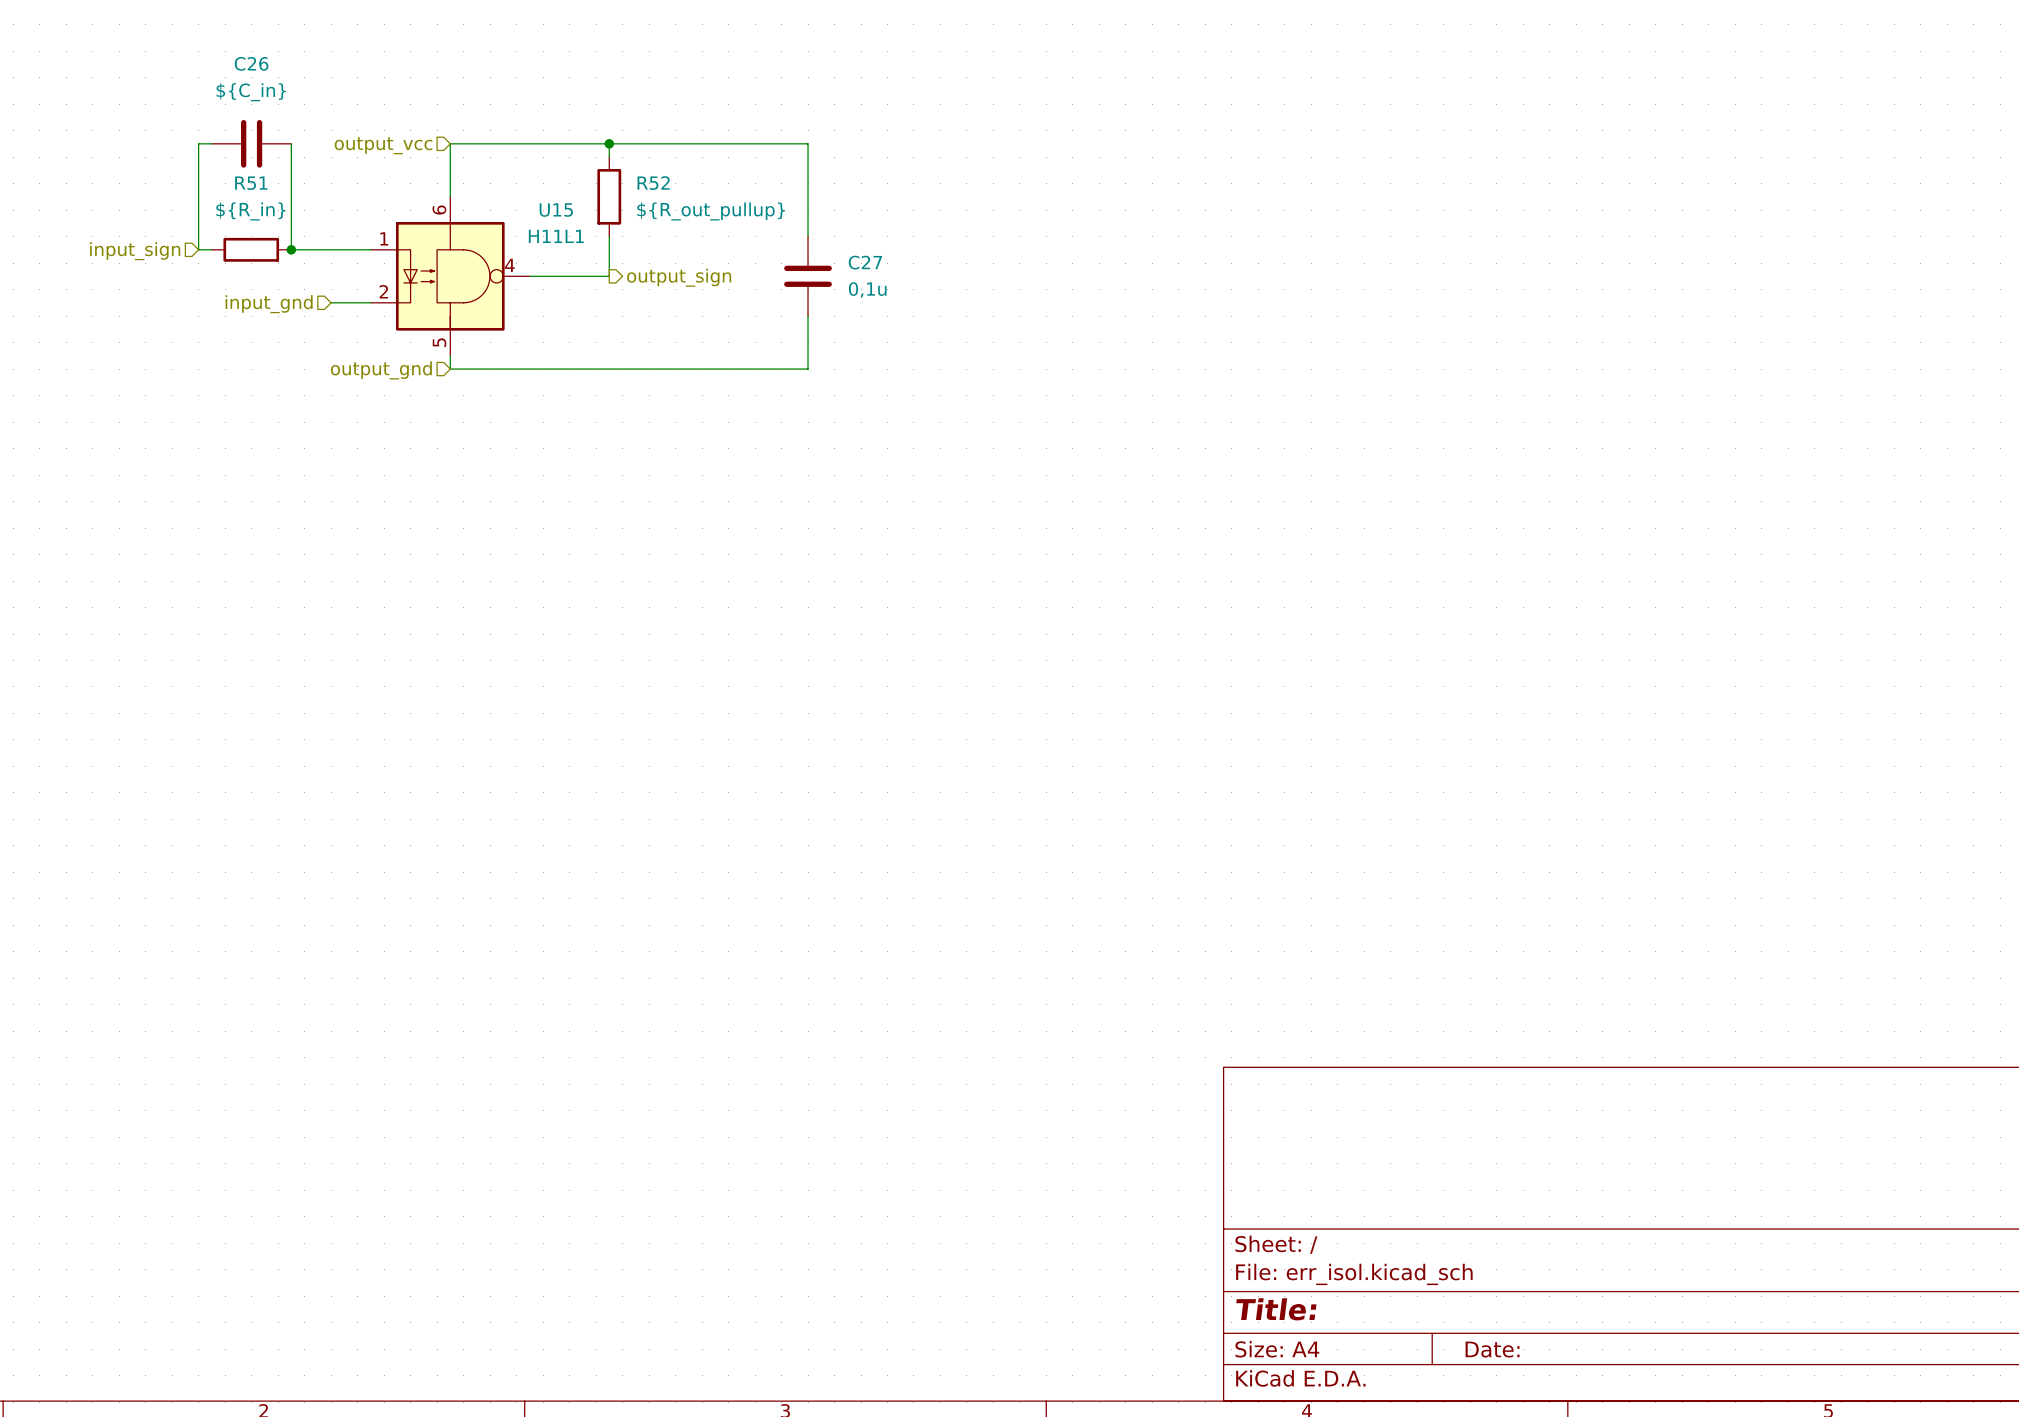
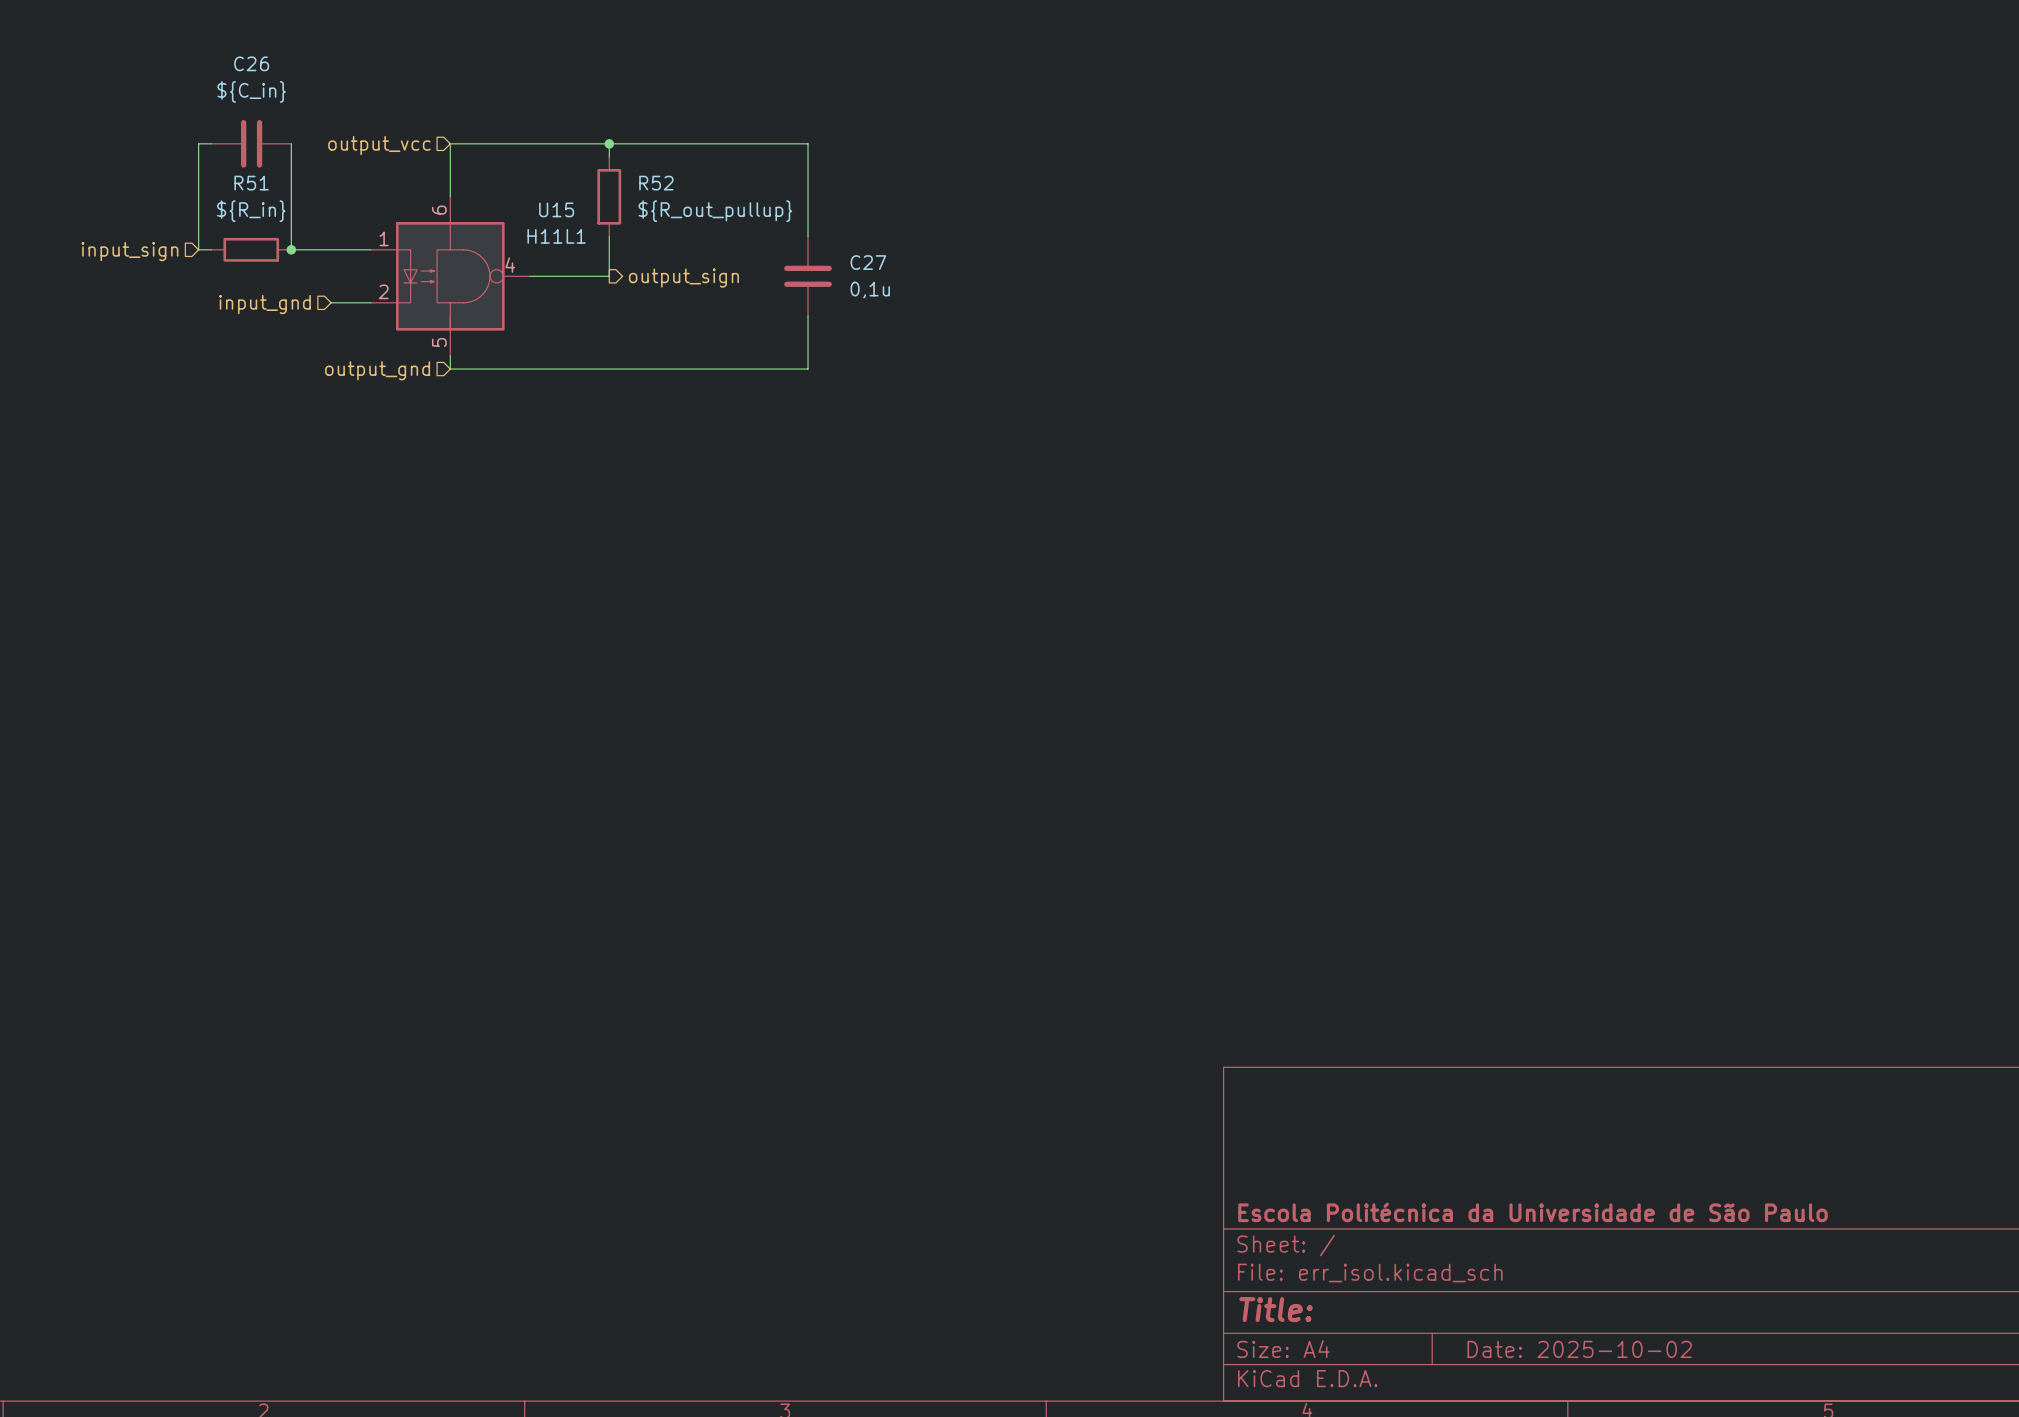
title block: none -> Escola Politécnica da Universidade de São Paulo (1532, 1212)
title block: Date: (1492, 1349) -> Date: 2025-10-02 (1579, 1349)

